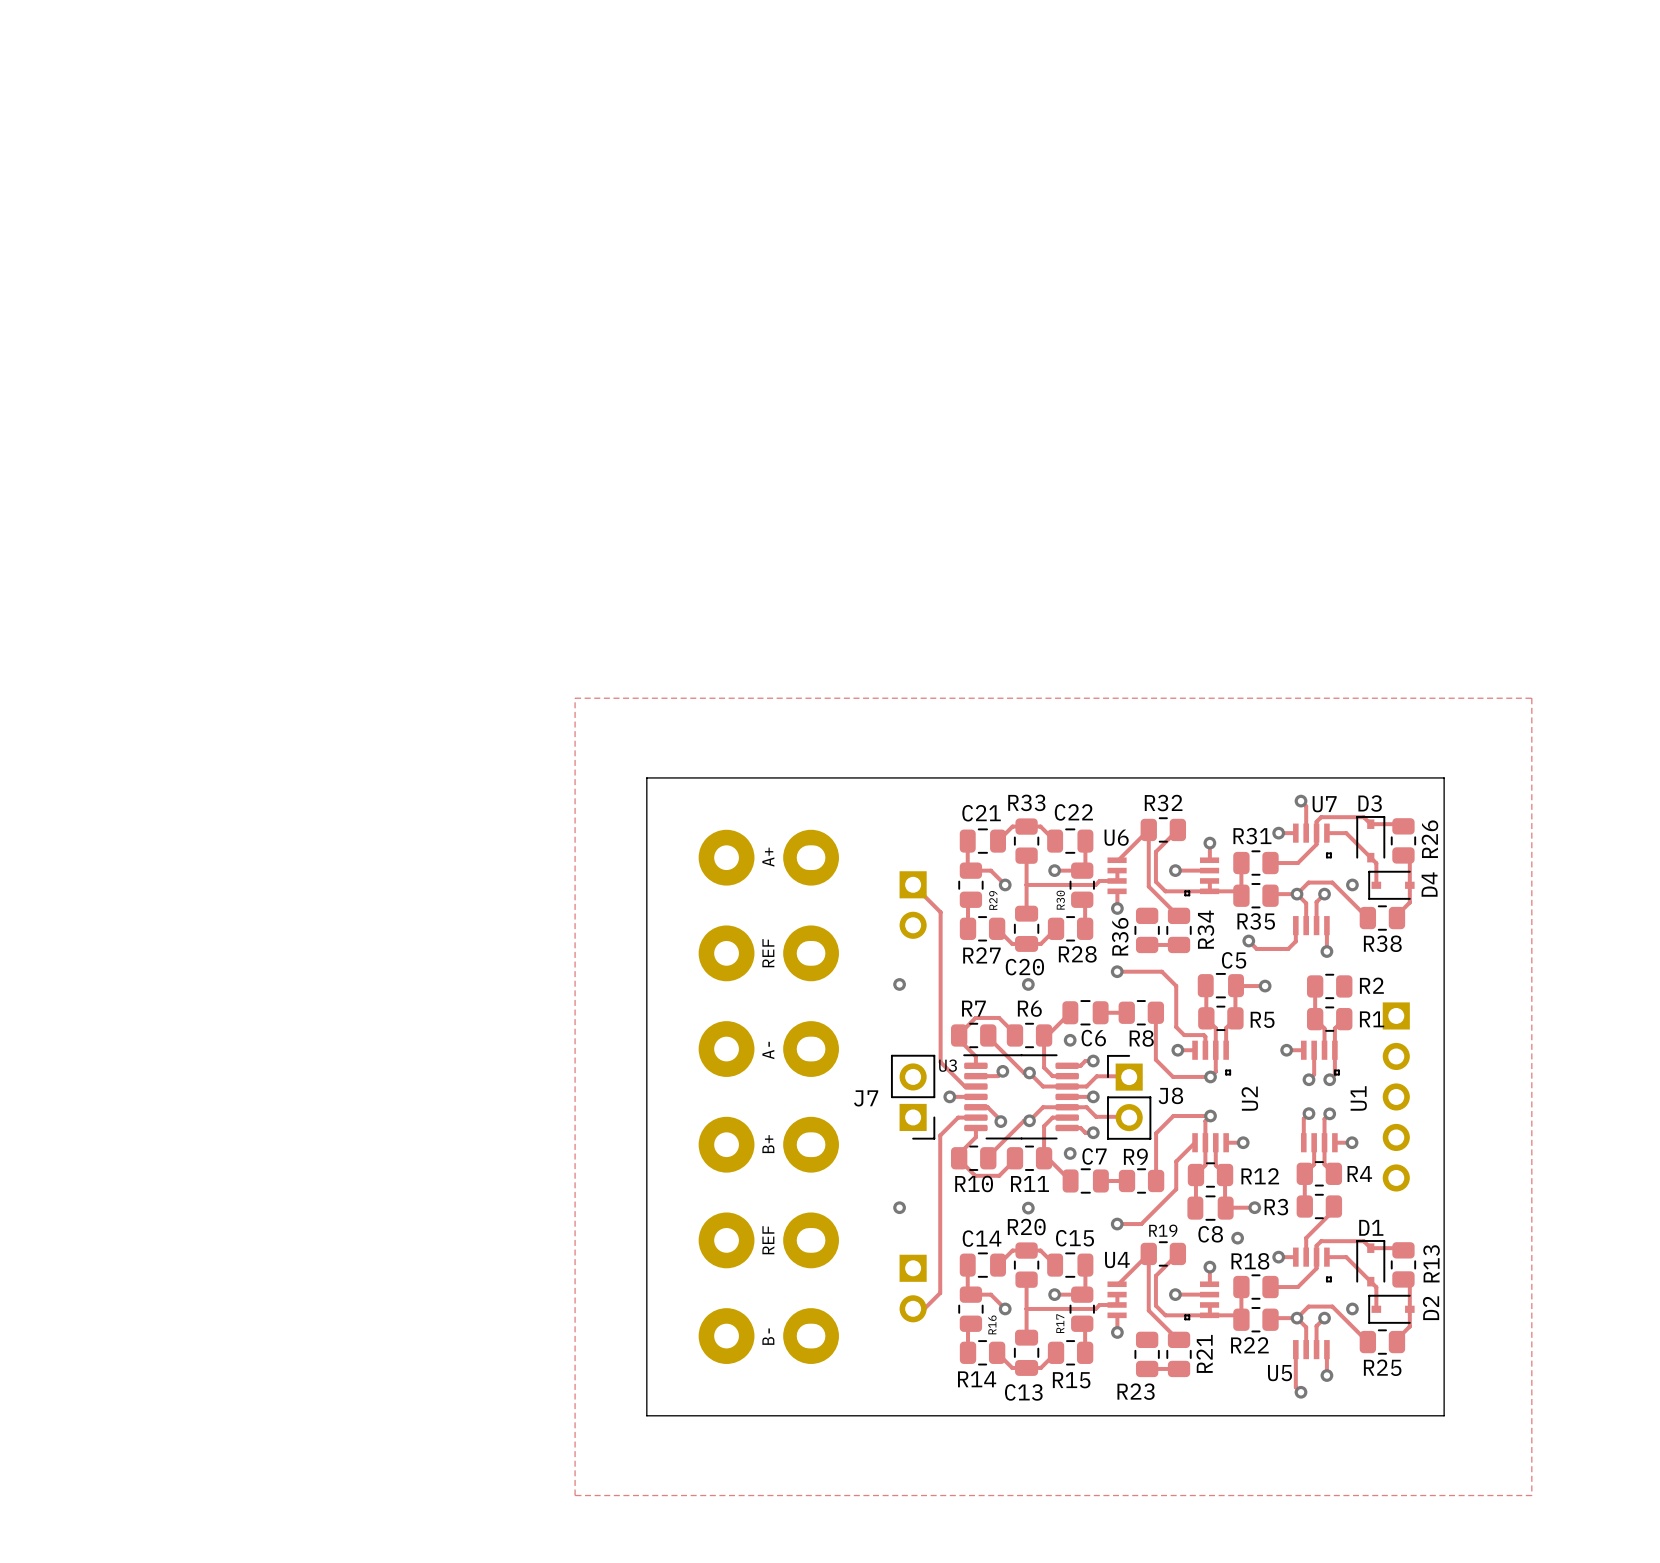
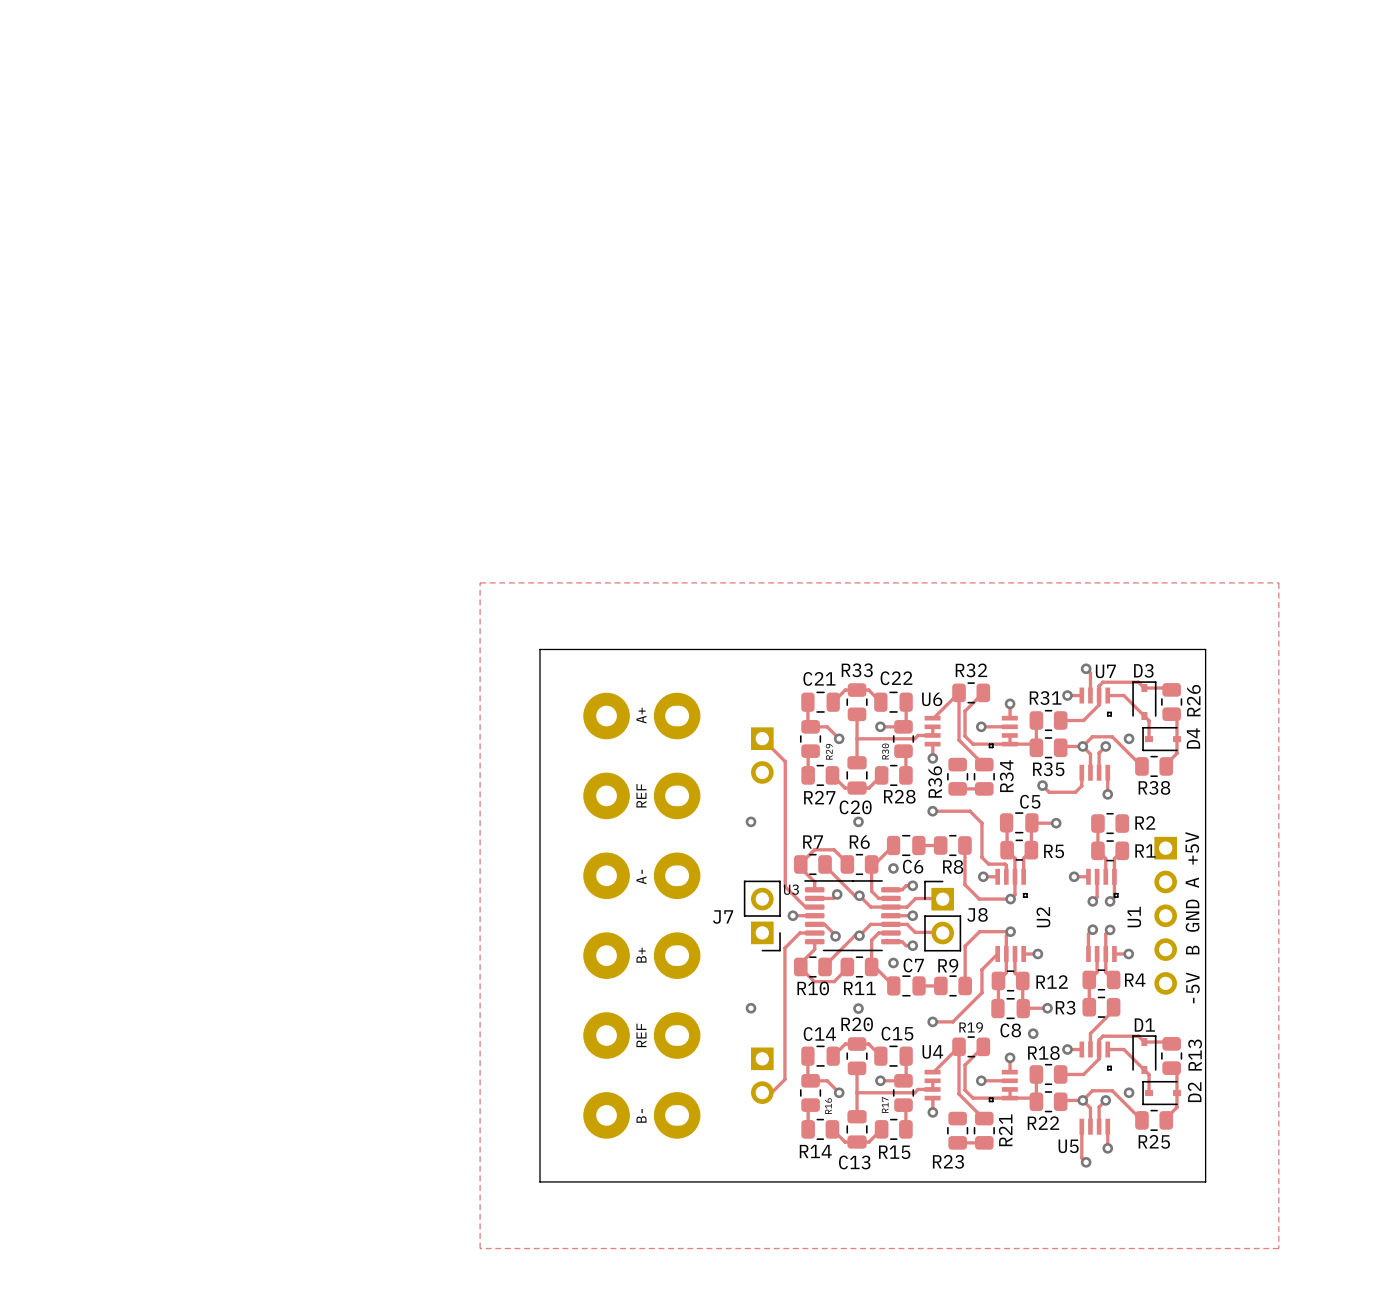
text: none -> +5V (1192, 848)
text: none -> A (1192, 882)
text: none -> GND (1192, 915)
text: none -> B (1192, 950)
text: none -> -5V (1192, 987)

